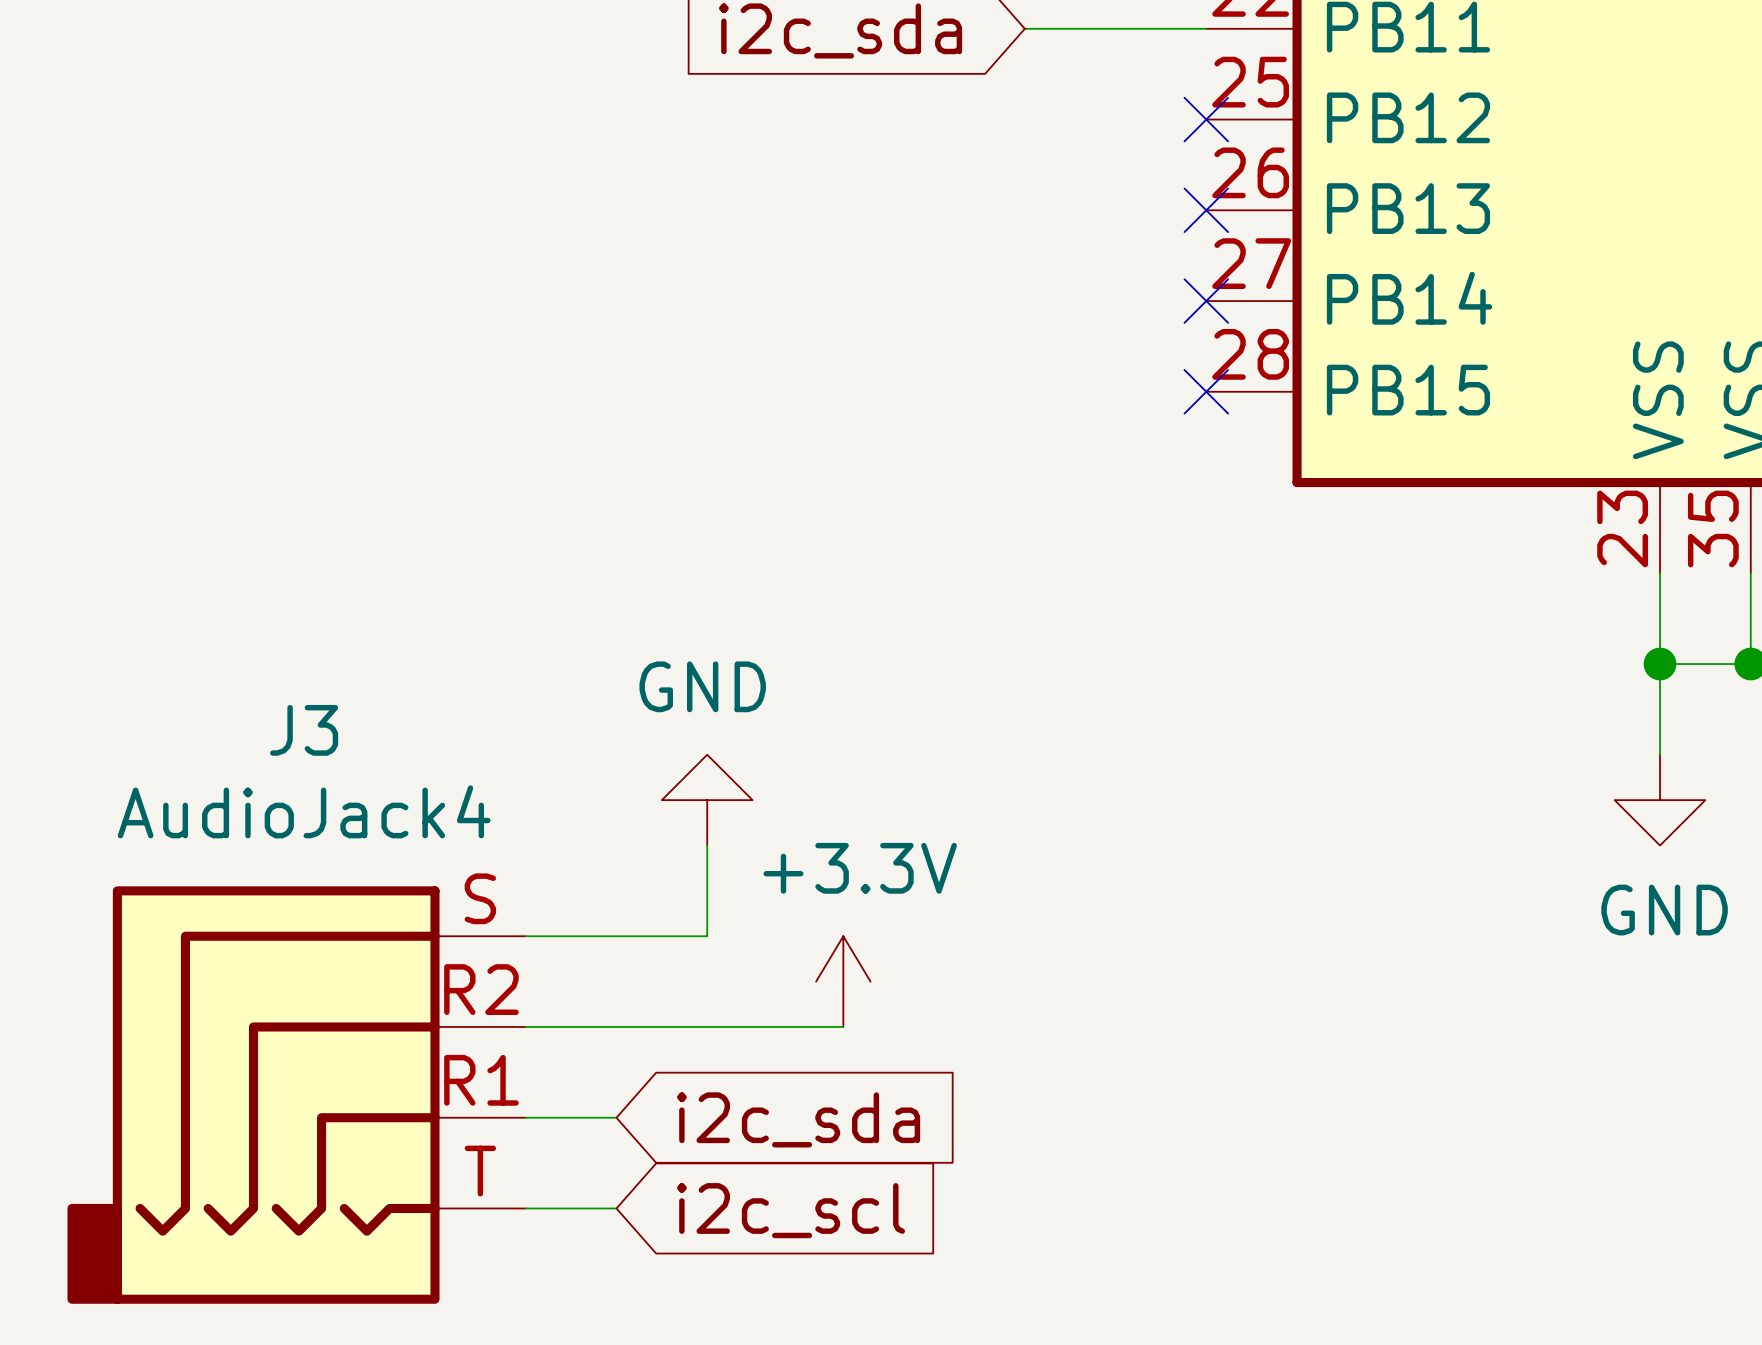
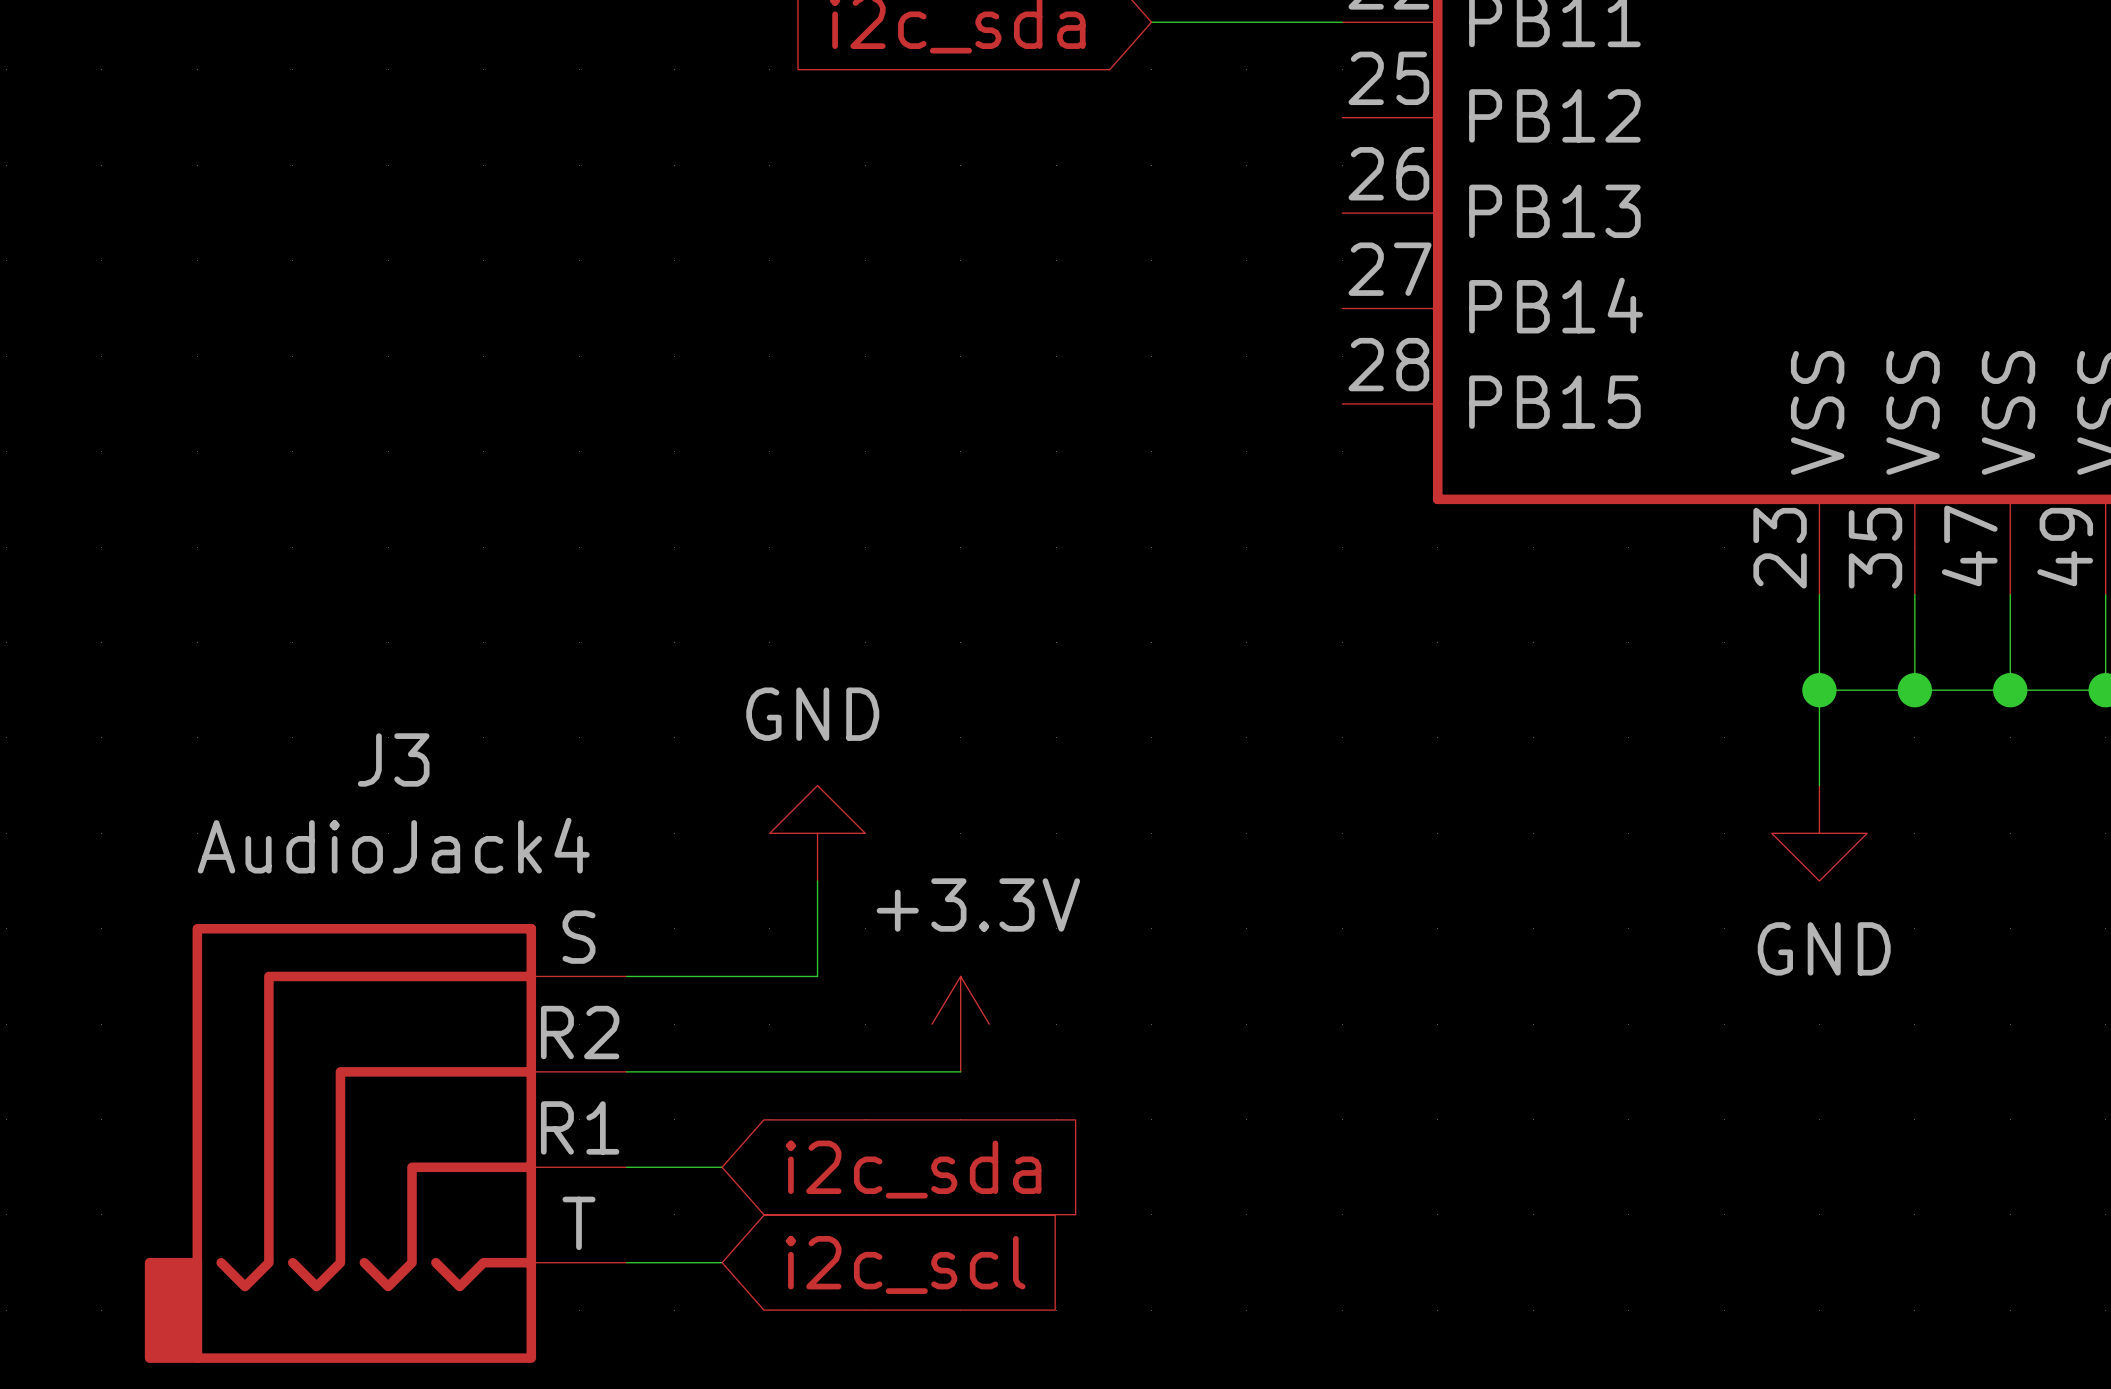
no-connect mark: (1206, 119) -> none
no-connect mark: (1206, 210) -> none
no-connect mark: (1206, 301) -> none
no-connect mark: (1206, 391) -> none

